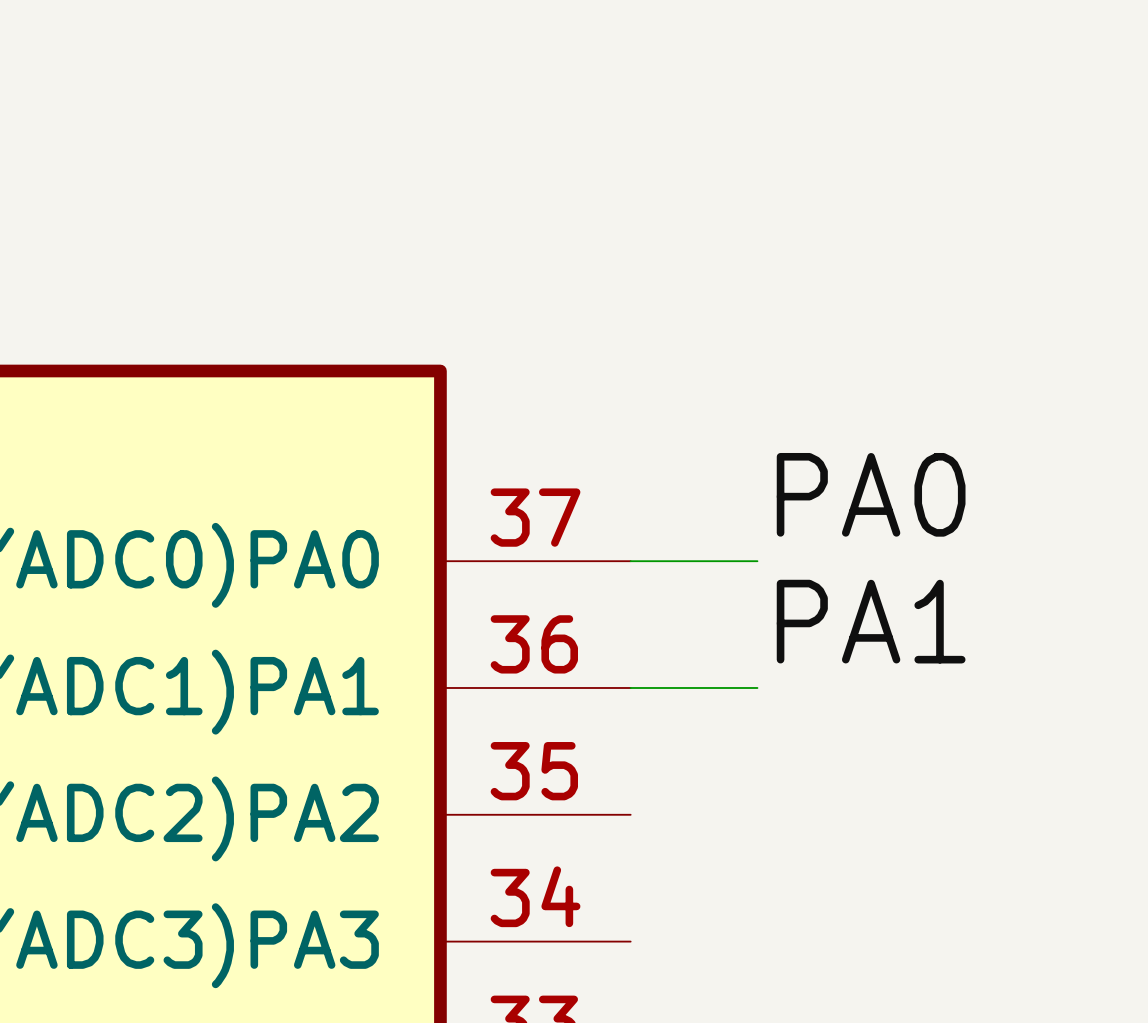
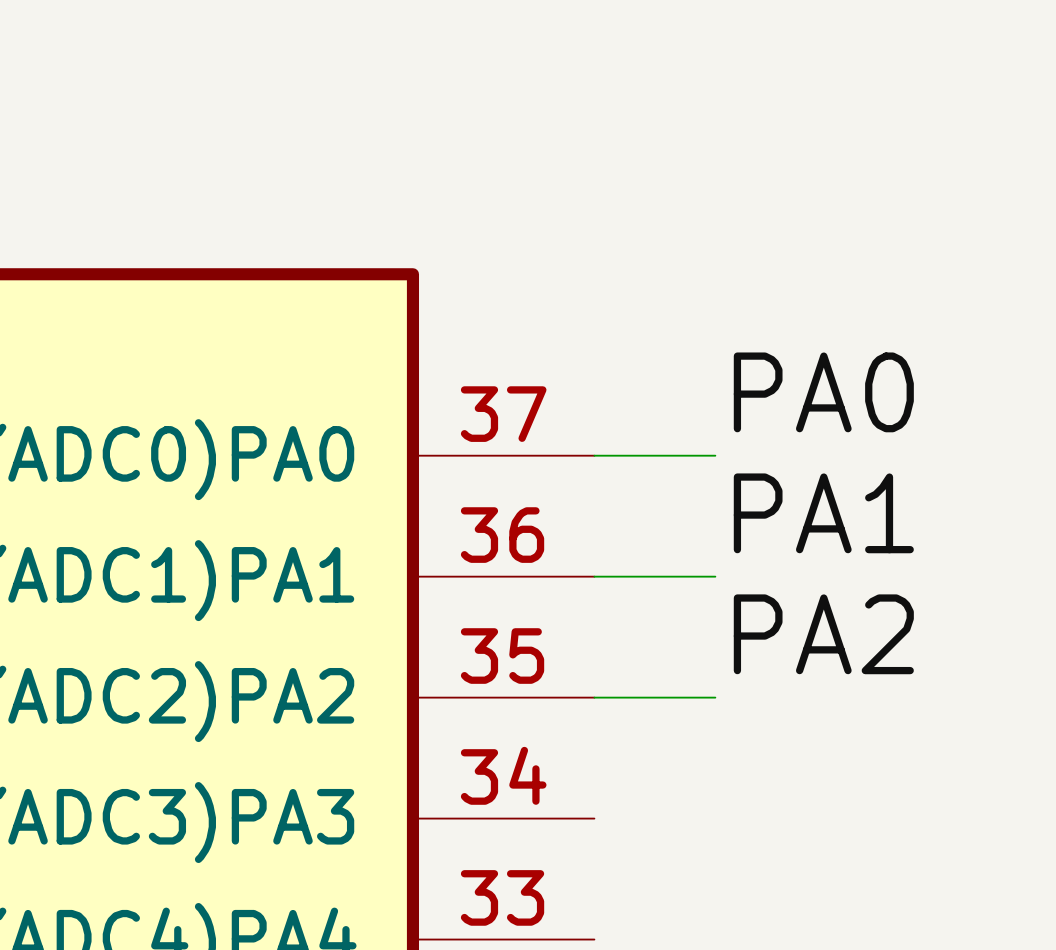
label: none -> PA2 (823, 634)
wire: none -> (594, 697) (715, 697)

